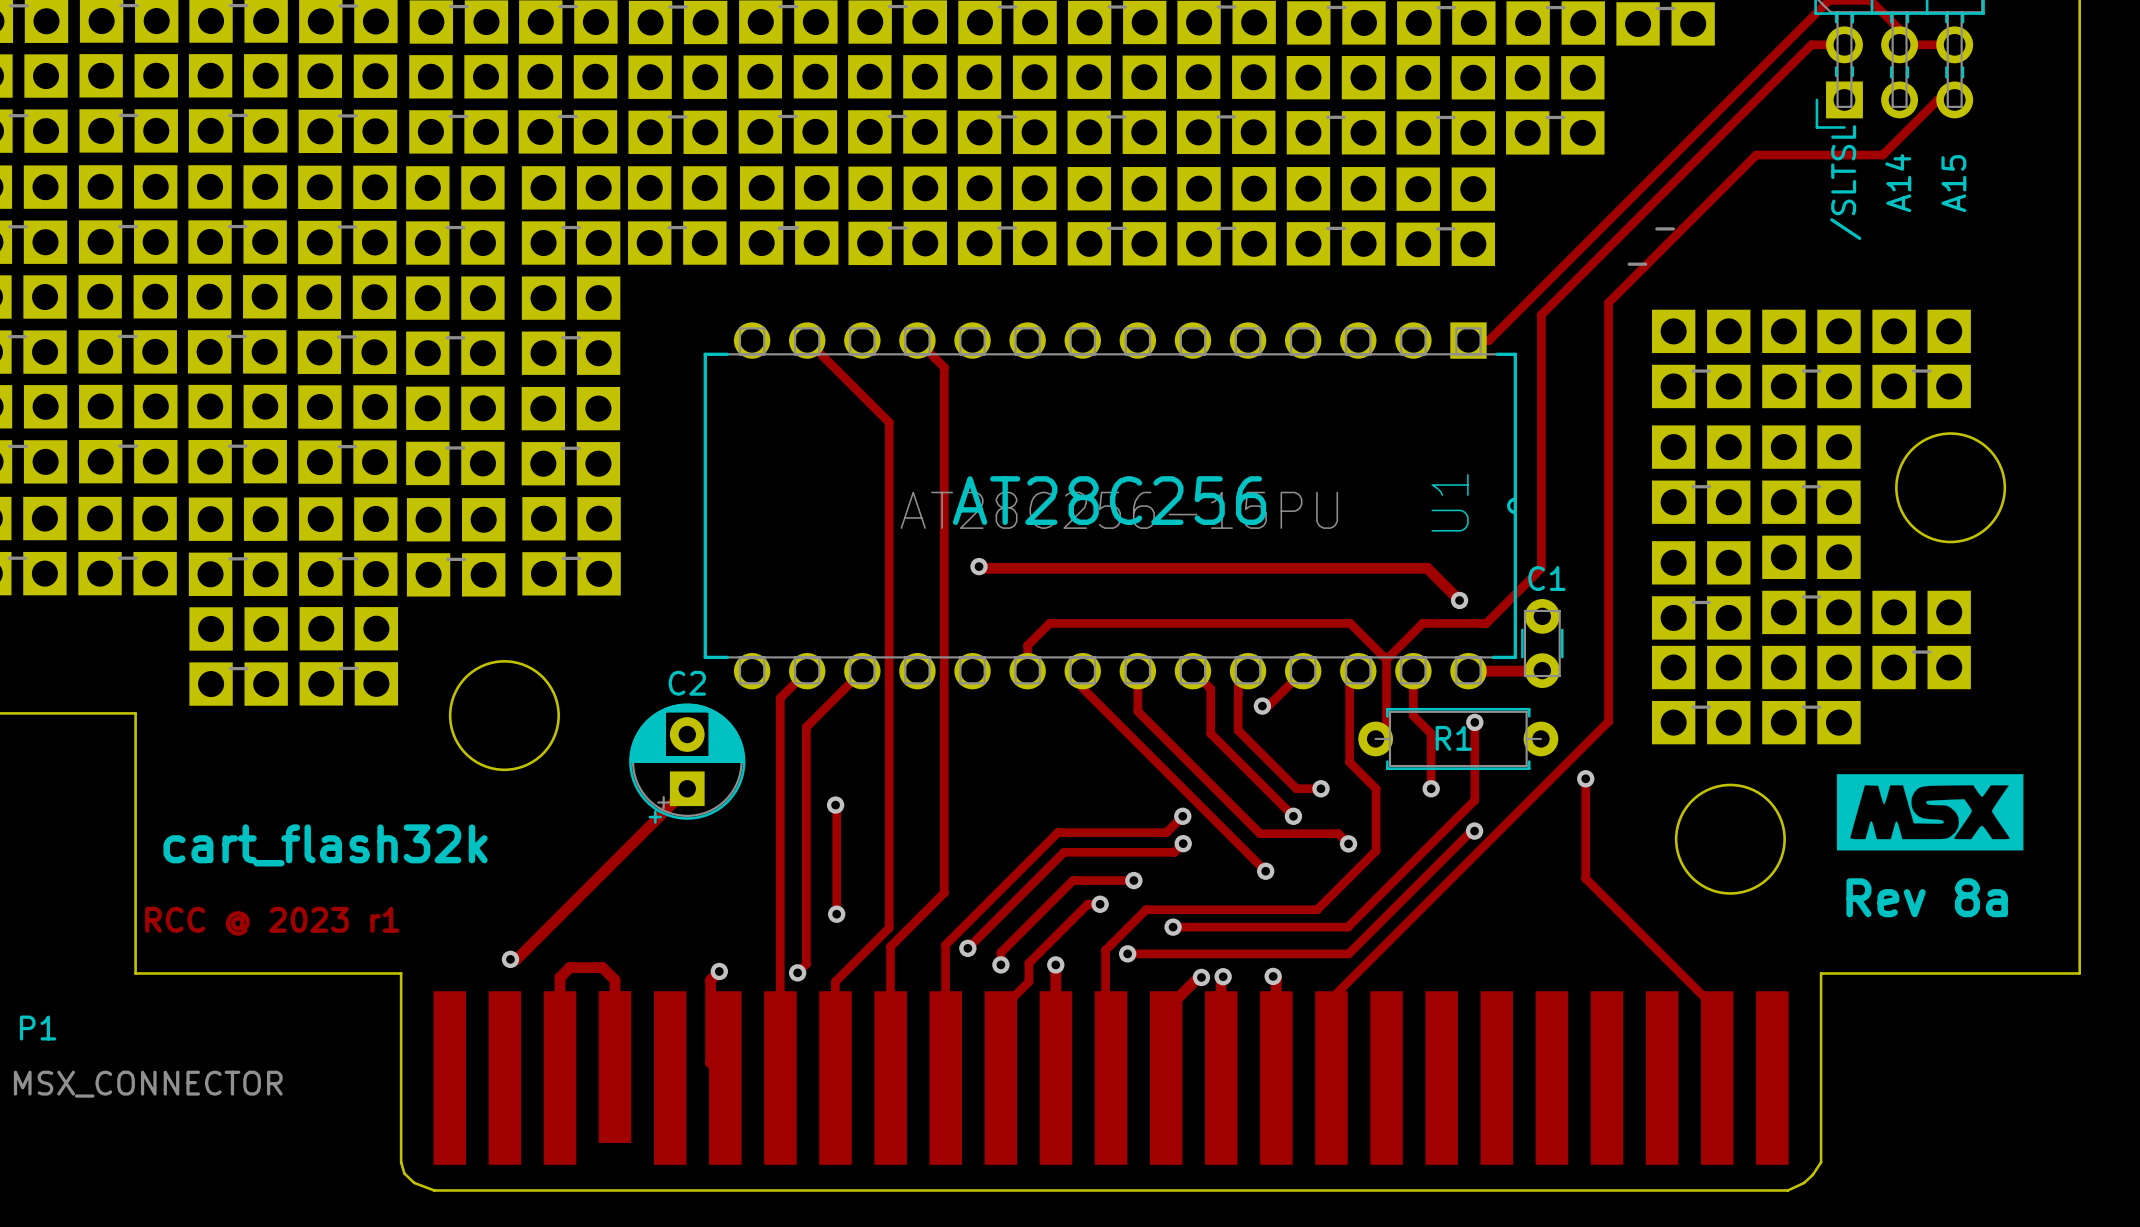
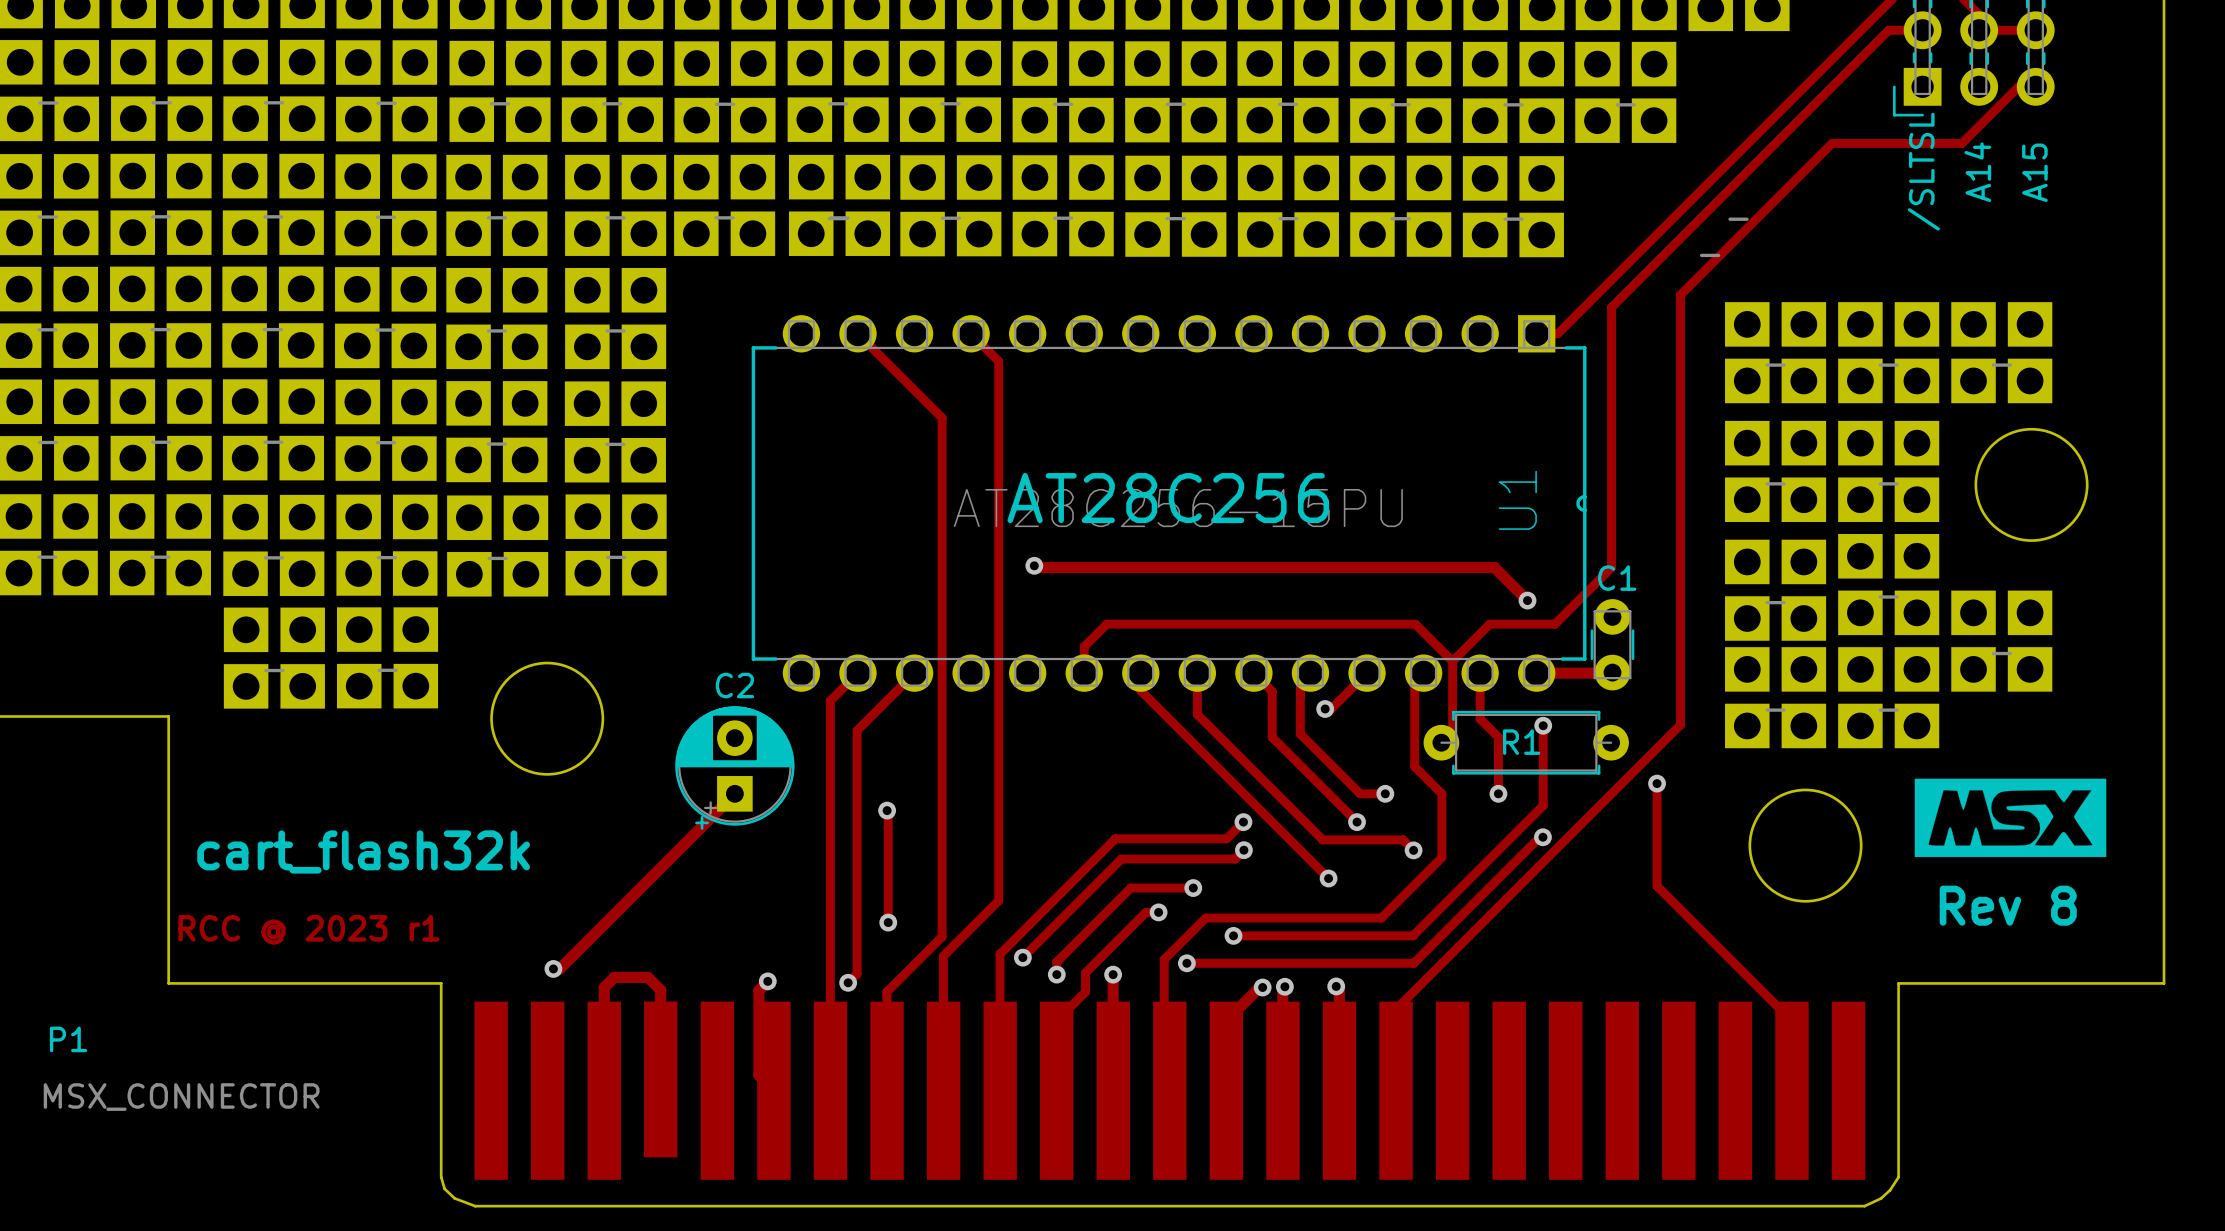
text: Rev 8a (1927, 897) -> Rev 8 (2008, 905)

